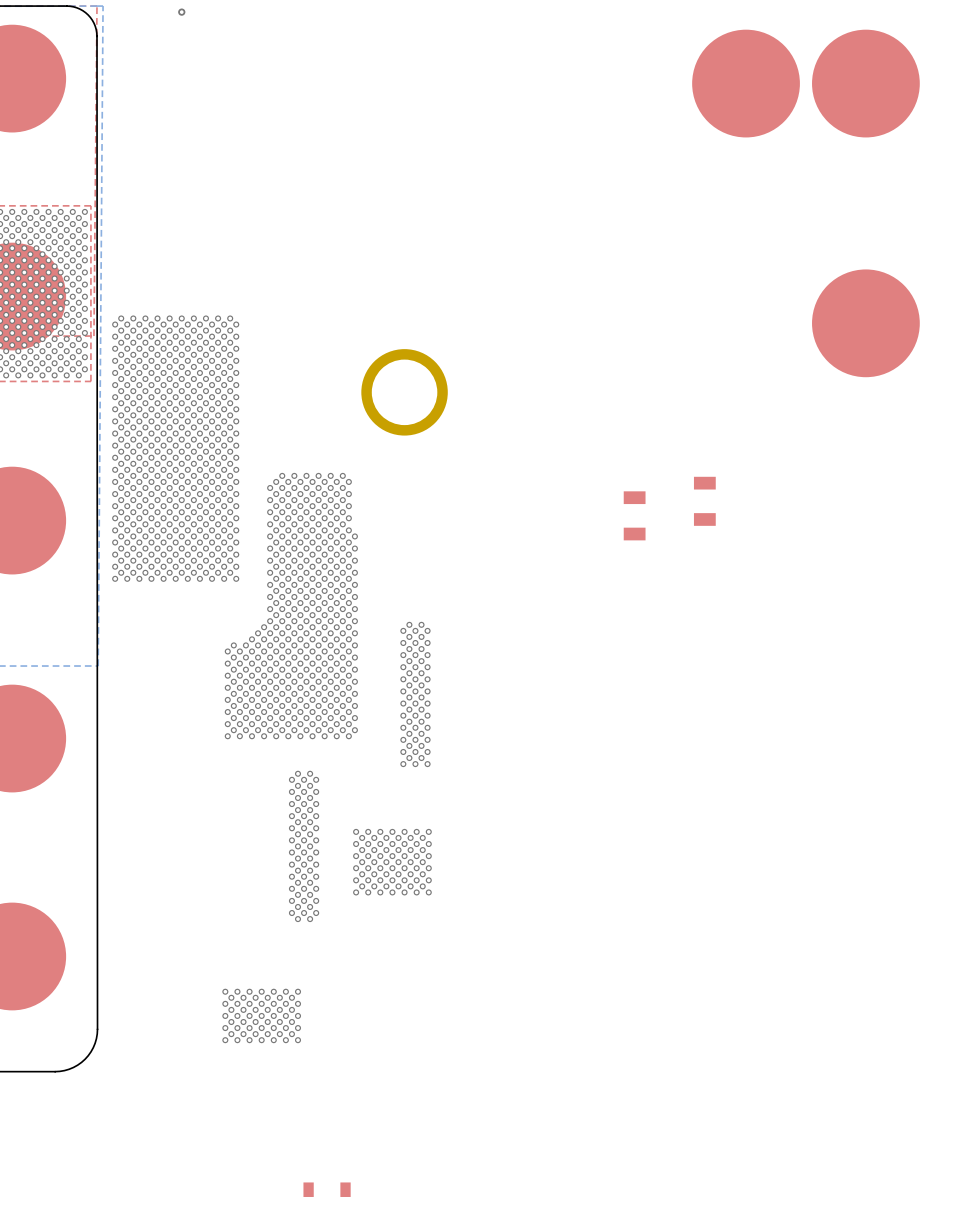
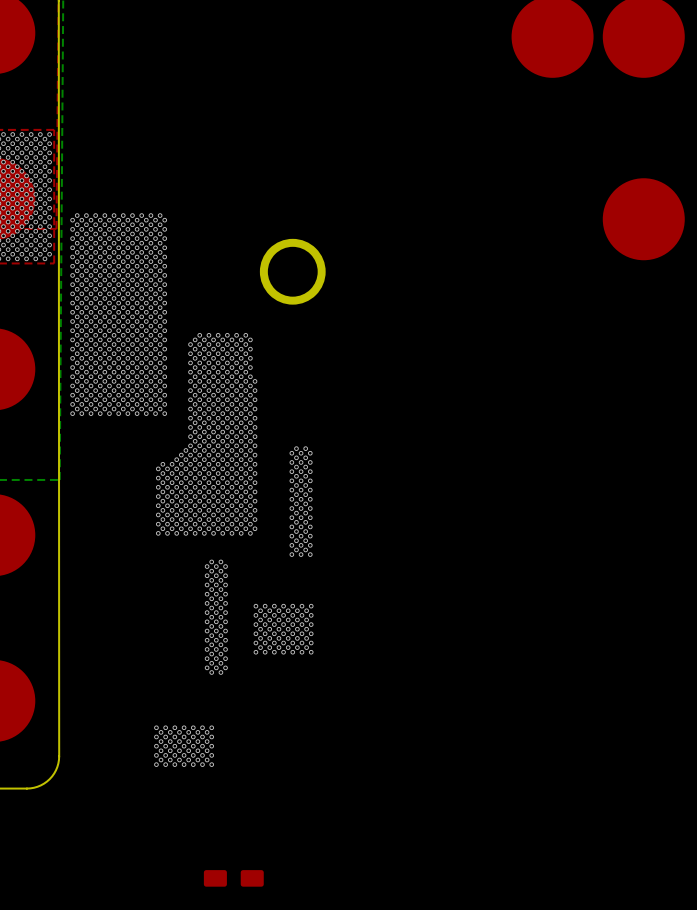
part: (704, 501) -> none
part: (634, 515) -> none
part footprint: [303, 1182, 351, 1197] -> [203, 870, 264, 887]

